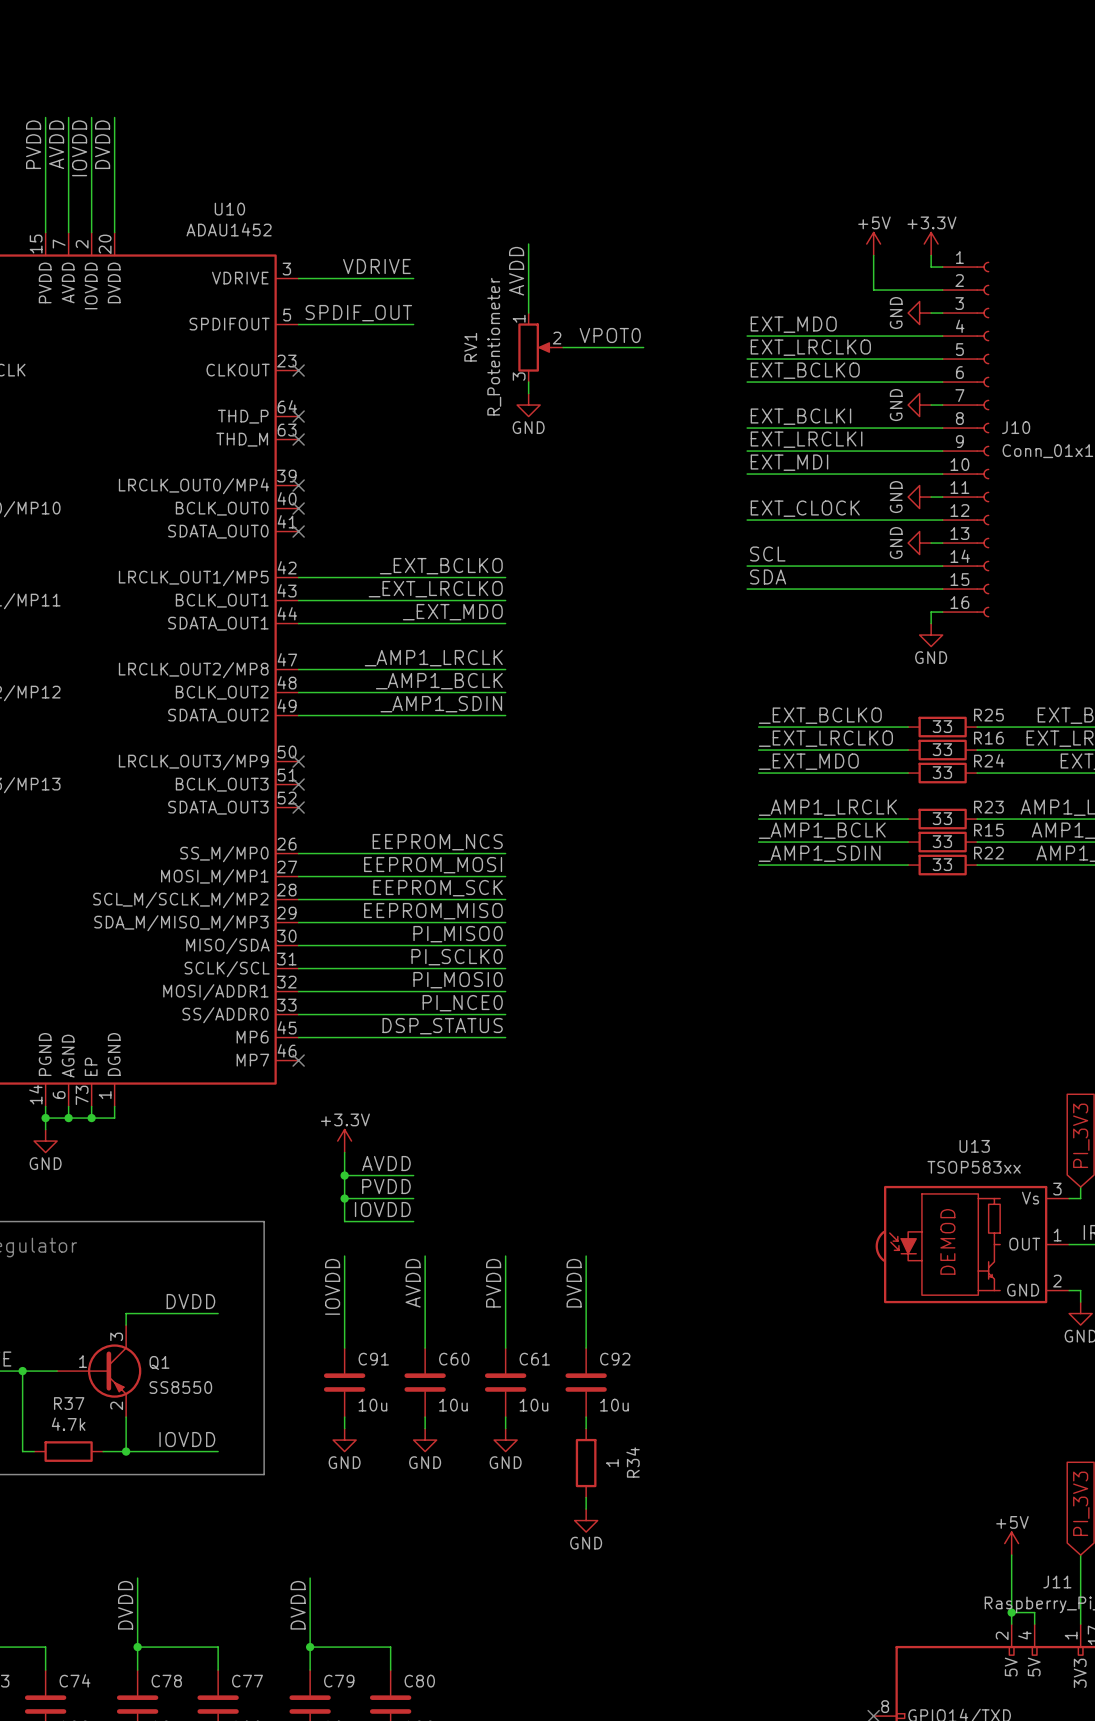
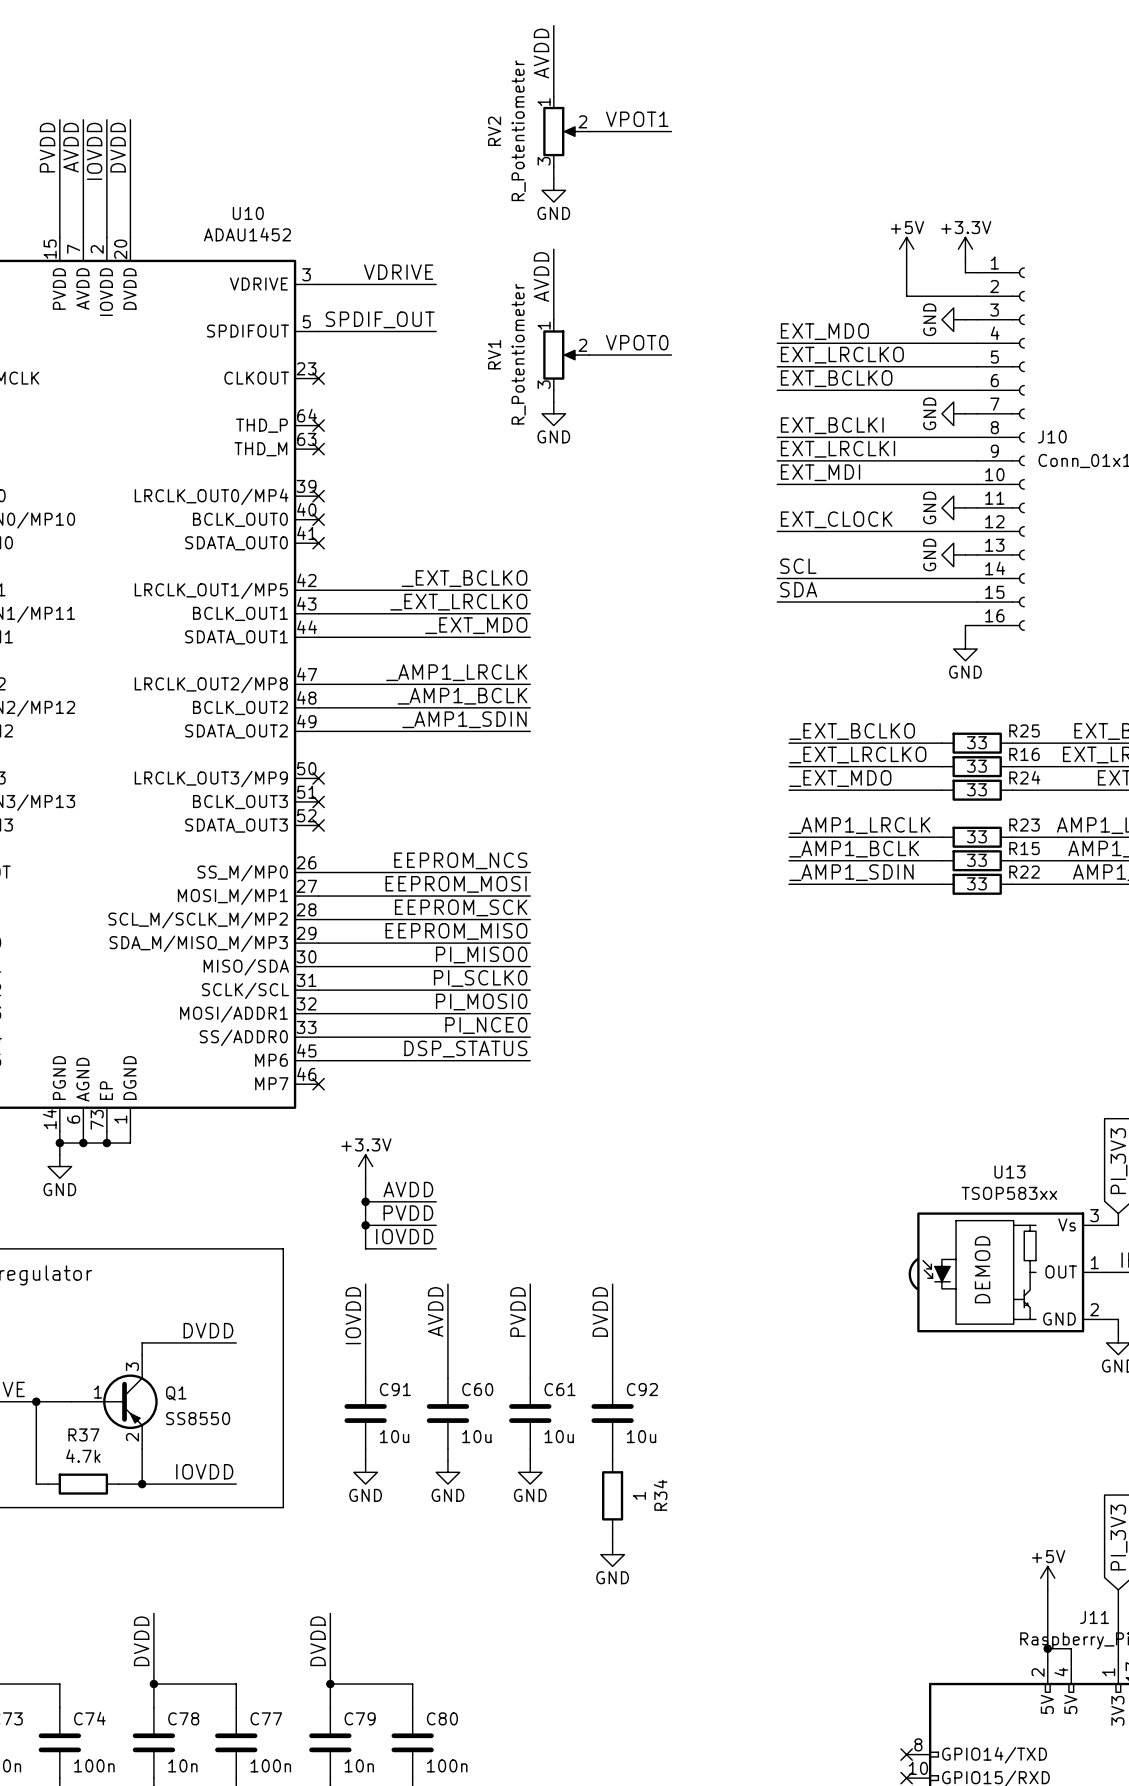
wire: none -> (553, 25) (553, 96)
label: none -> AVDD (541, 53)
label: none -> VPOT1 (637, 119)
RV2: none -> R_Potentiometer (566, 131)
wire: none -> (589, 131) (671, 131)
wire: none -> (553, 166) (553, 178)
power symbol: none -> GND (553, 190)

